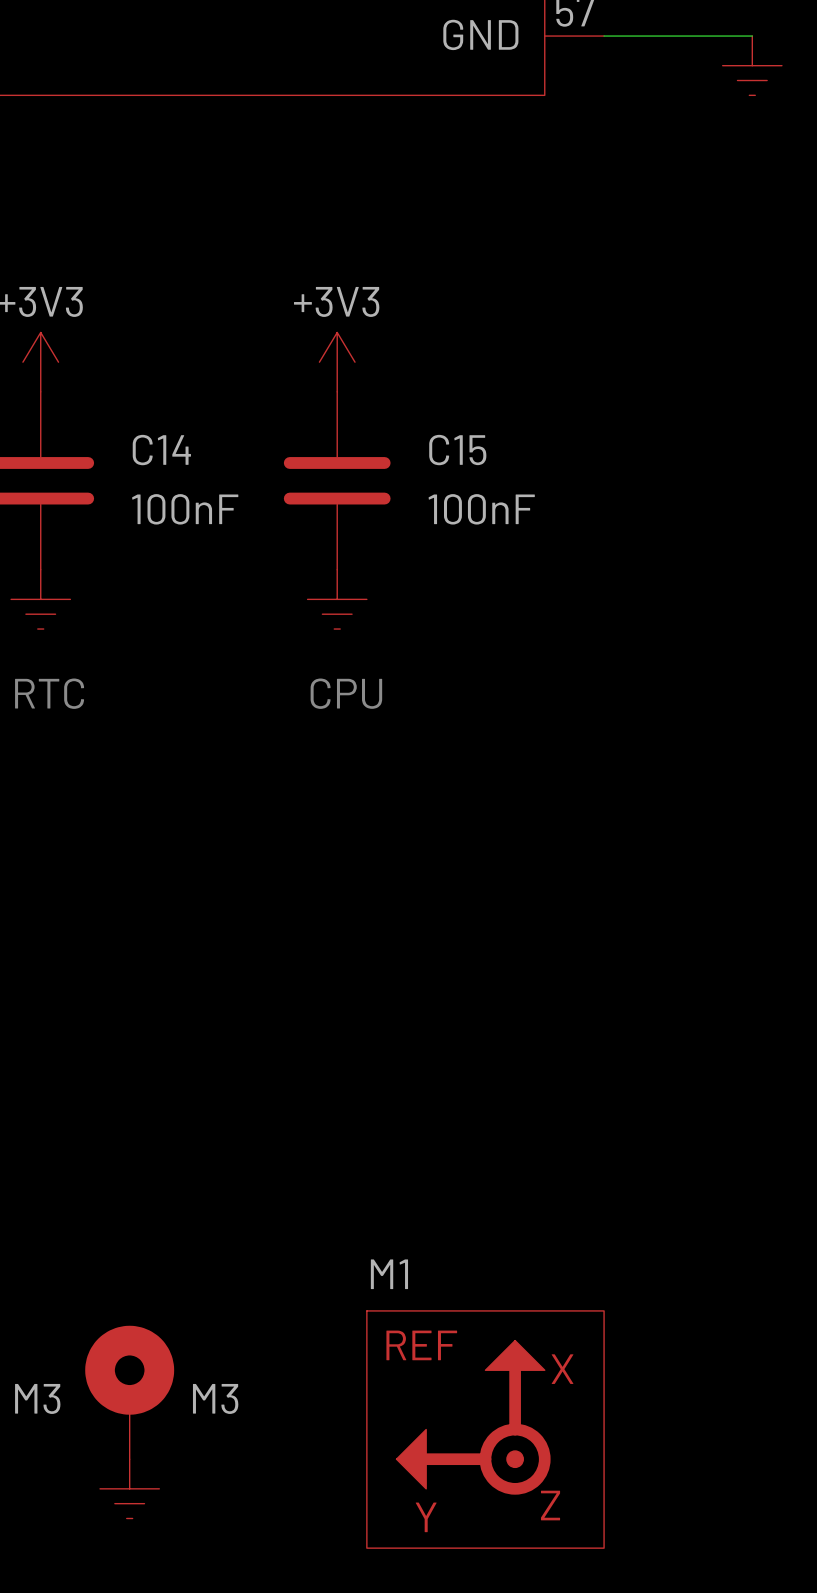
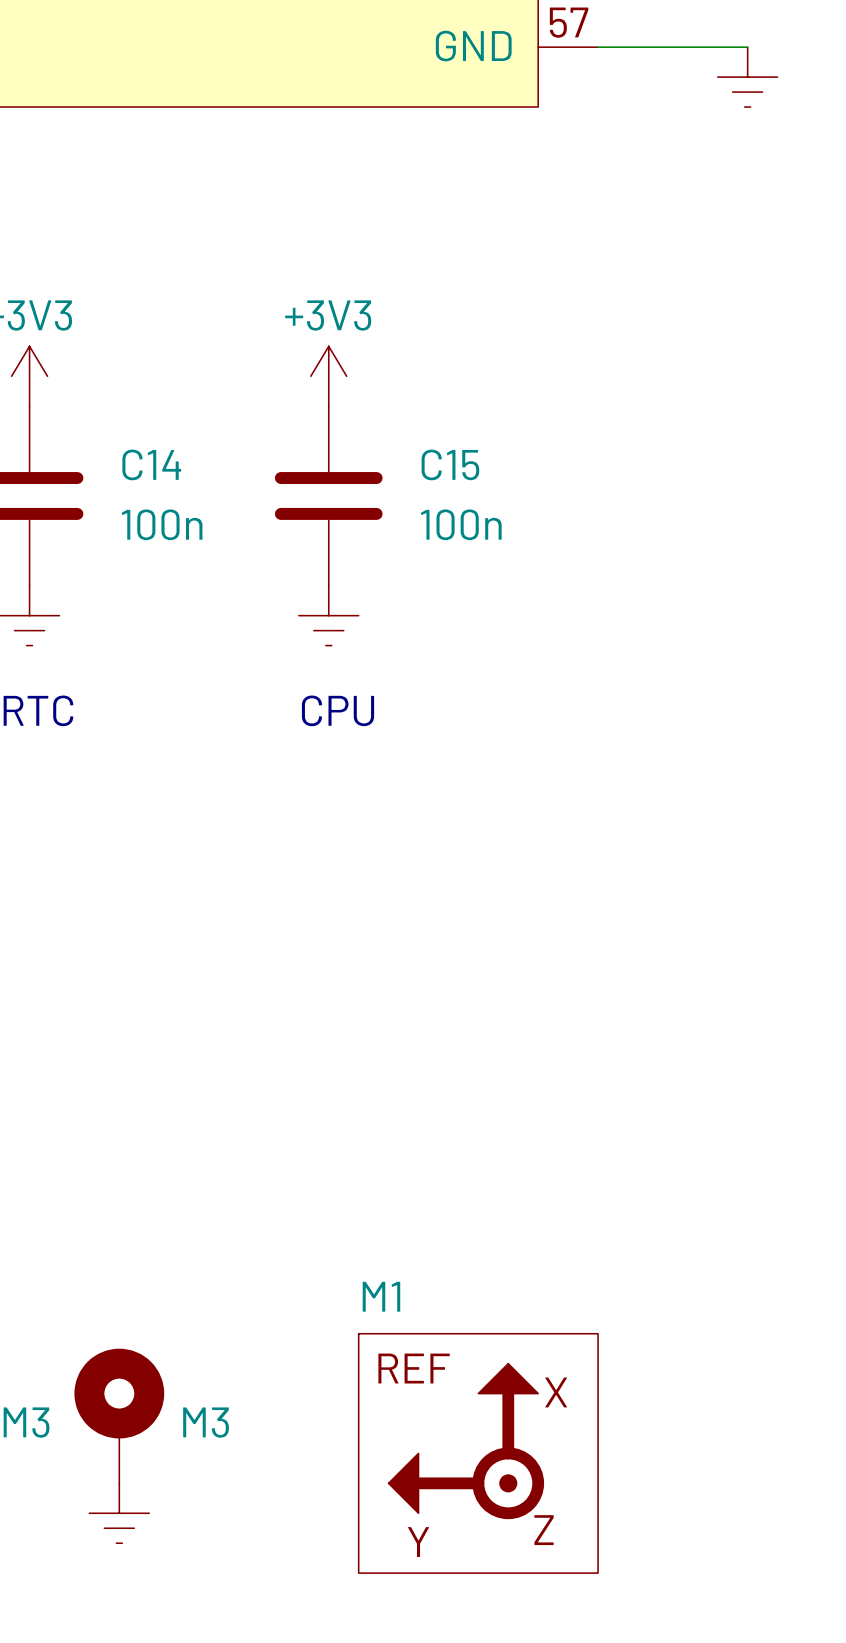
C14 value: 100nF (185, 509) -> 100n (162, 524)
C15 value: 100nF (481, 509) -> 100n (461, 524)

